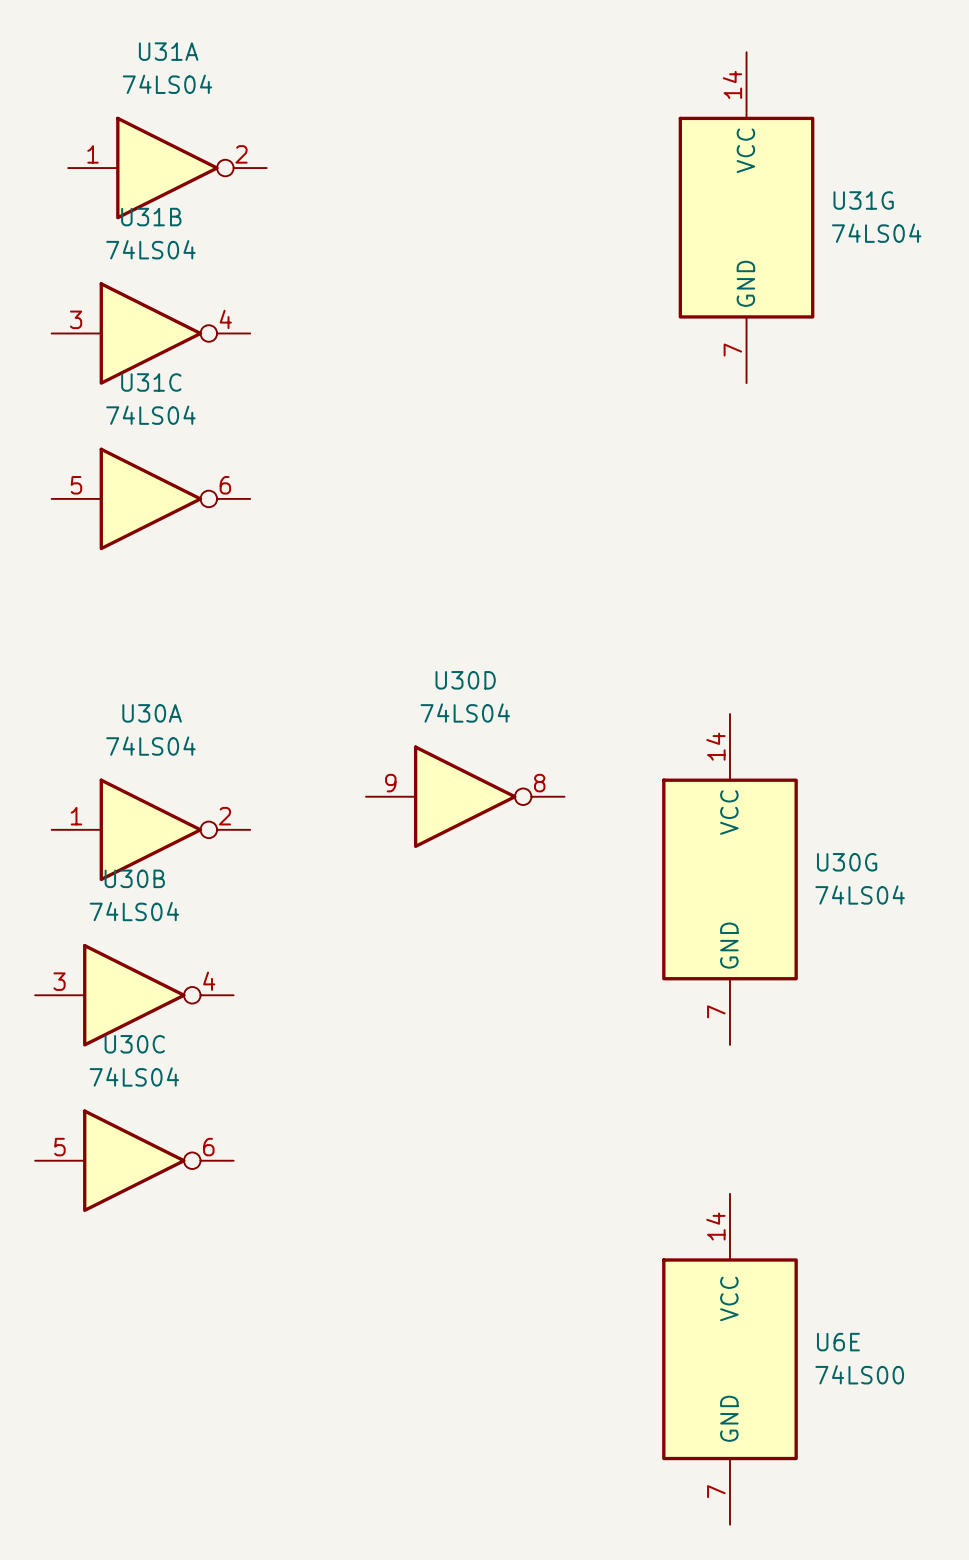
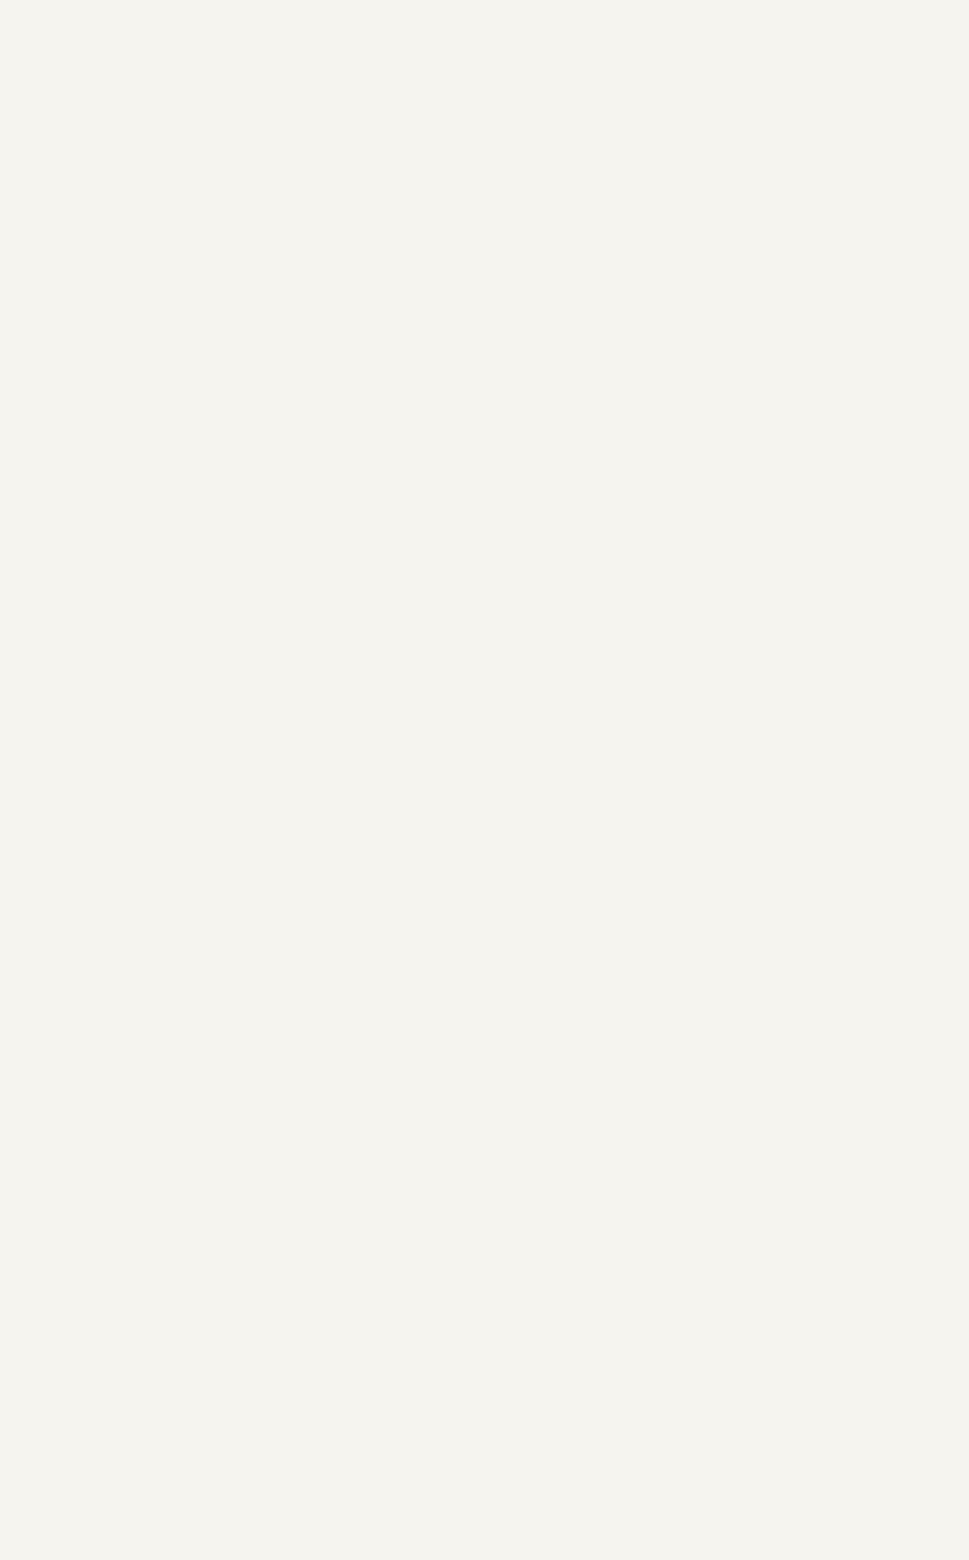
U31A: 74LS04 (167, 168) -> none
U31G: 74LS04 (746, 217) -> none
U31B: 74LS04 (150, 333) -> none
U31C: 74LS04 (150, 498) -> none
U30D: 74LS04 (465, 796) -> none
U30A: 74LS04 (150, 829) -> none
U30G: 74LS04 (729, 879) -> none
U30B: 74LS04 (134, 995) -> none
U30C: 74LS04 (134, 1160) -> none
U6E: 74LS00 (729, 1359) -> none

